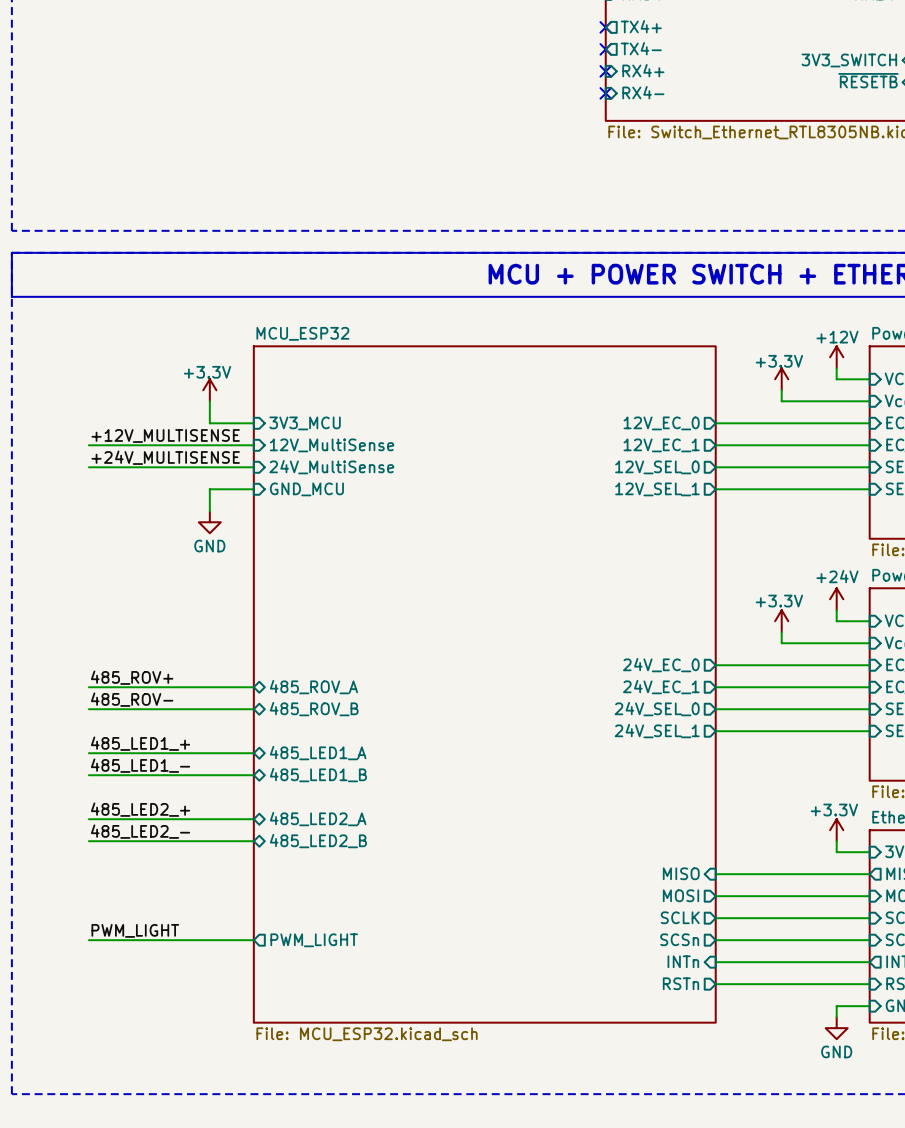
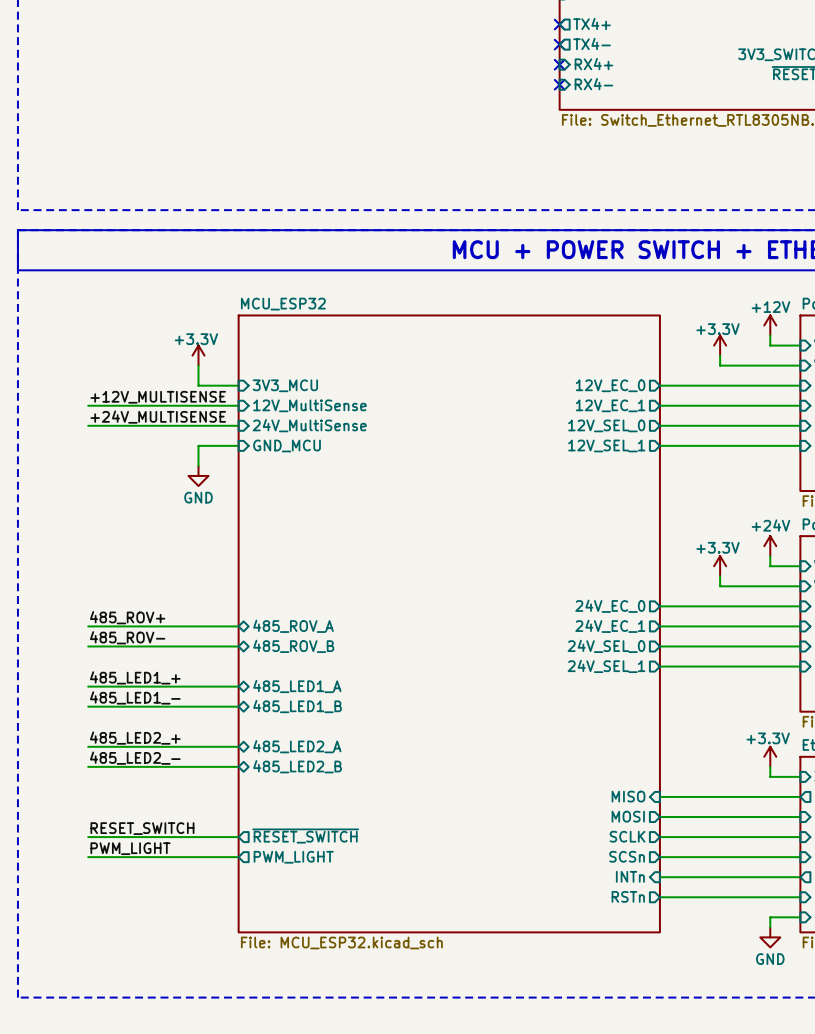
label: none -> RESET_SWITCH (142, 828)
sheet pin: none -> ~{RESET_SWITCH} (305, 836)
wire: none -> (88, 837) (238, 837)

